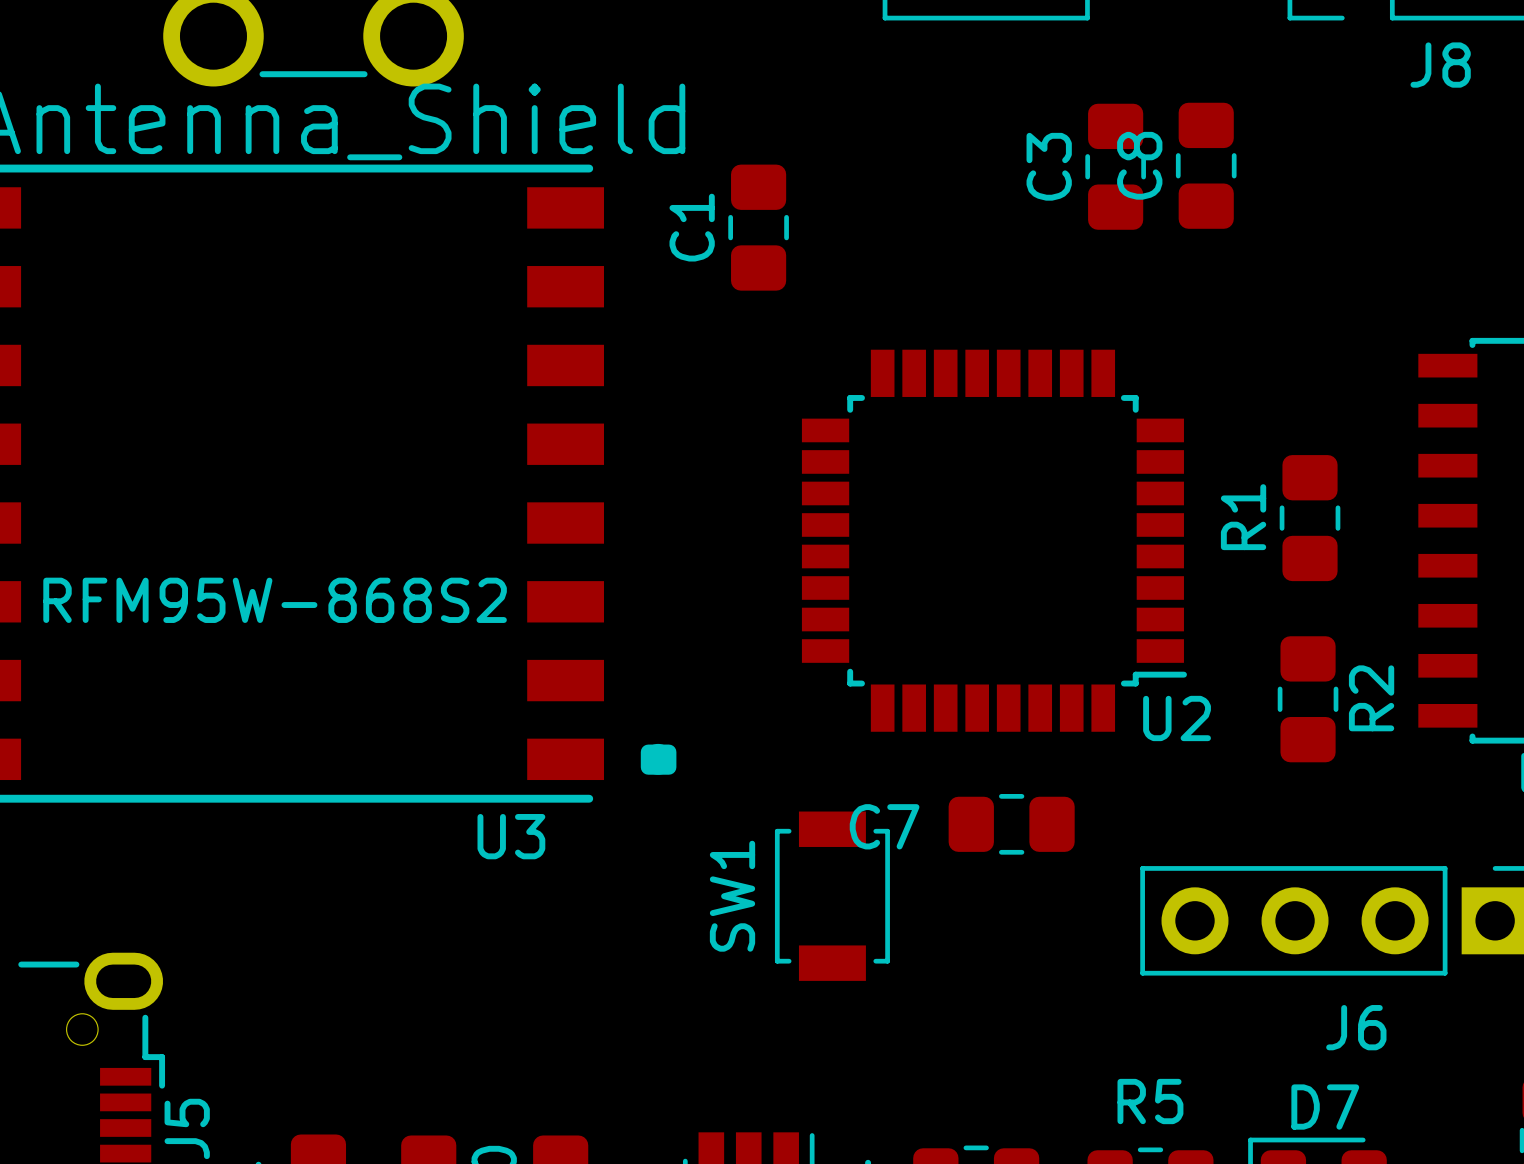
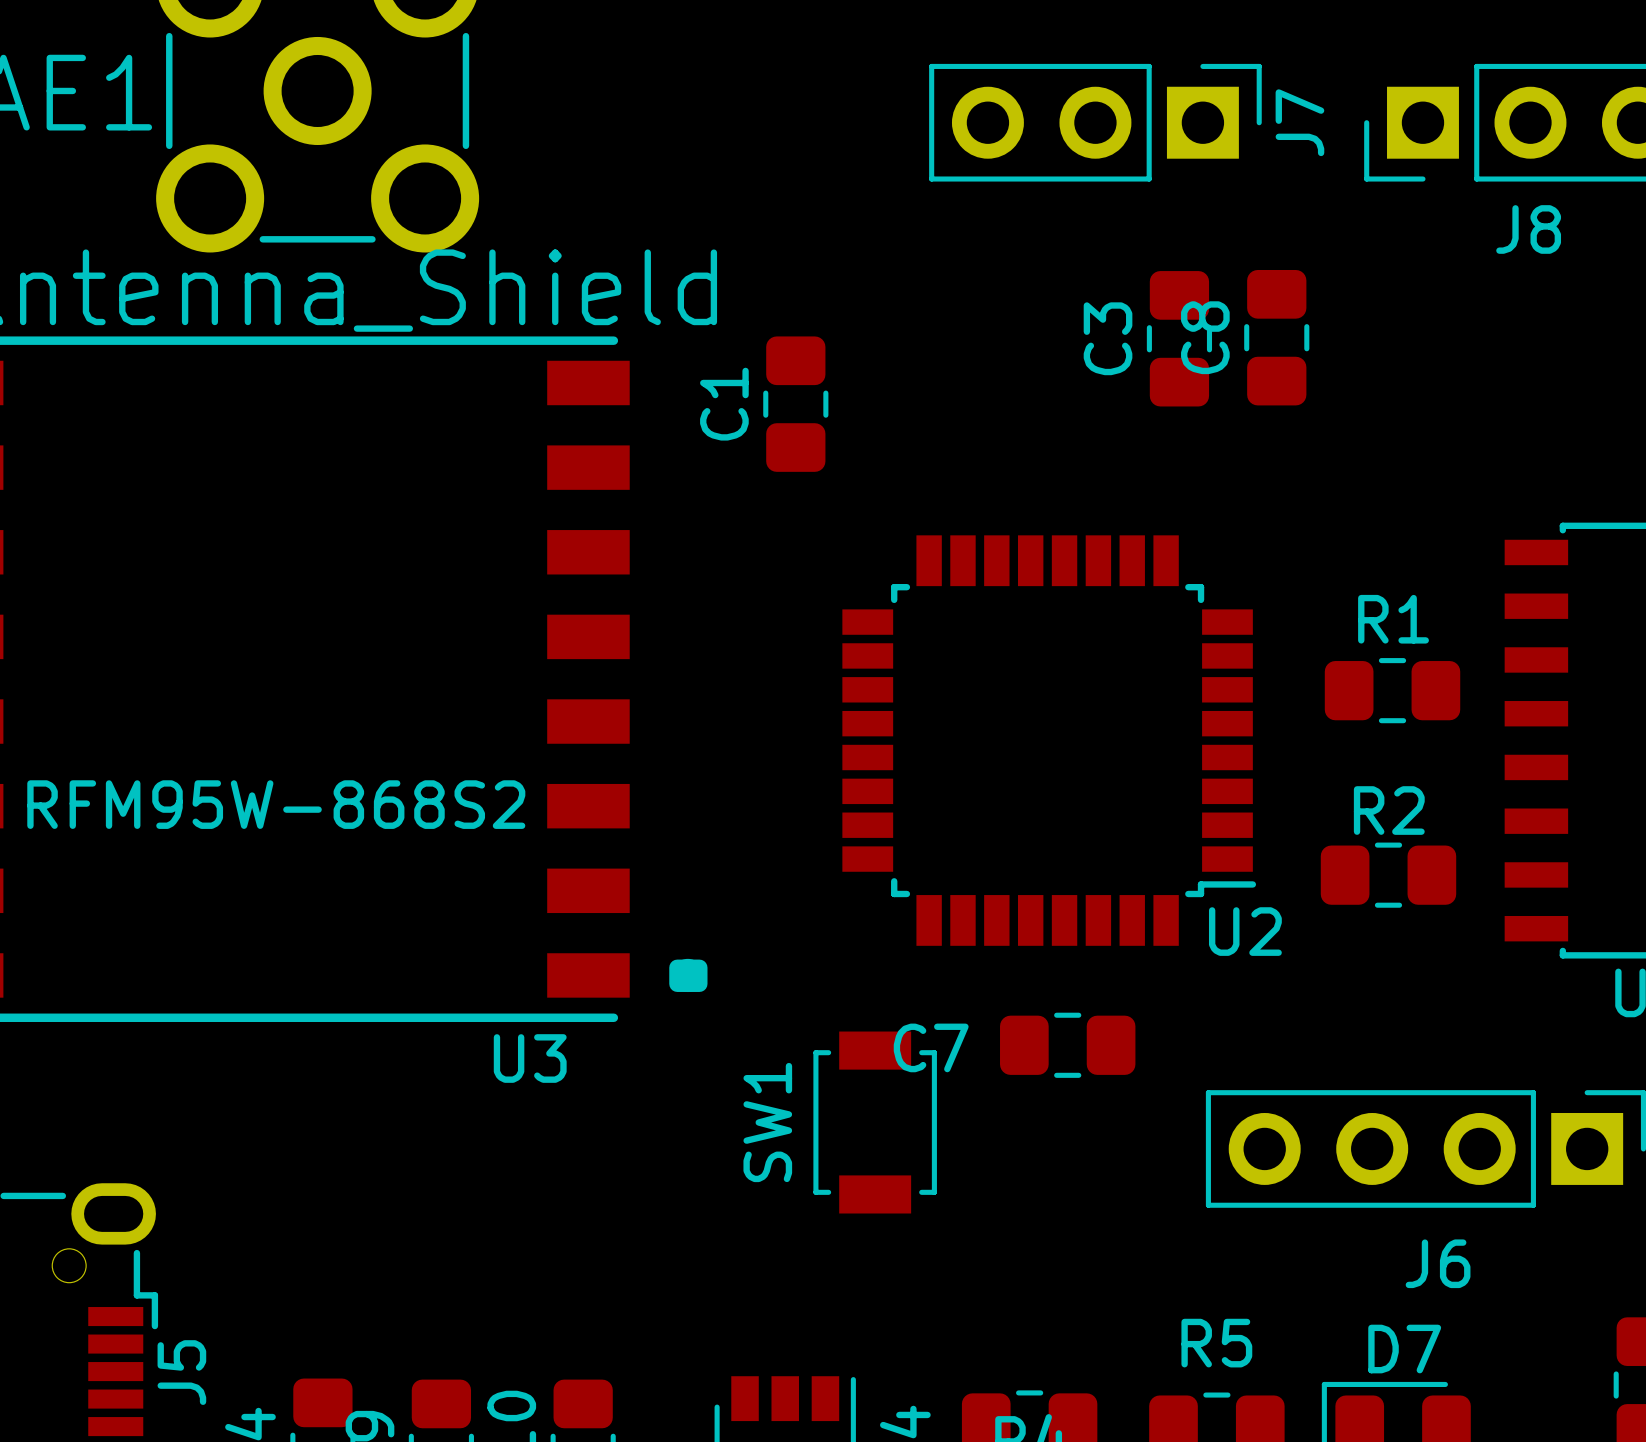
R1 rotation: 0° (1310, 518) -> 90° clockwise (1392, 690)
R2 name position: R2 (1371, 698) -> R2 (1389, 810)
R2 rotation: 0° (1308, 699) -> 90° clockwise (1388, 875)

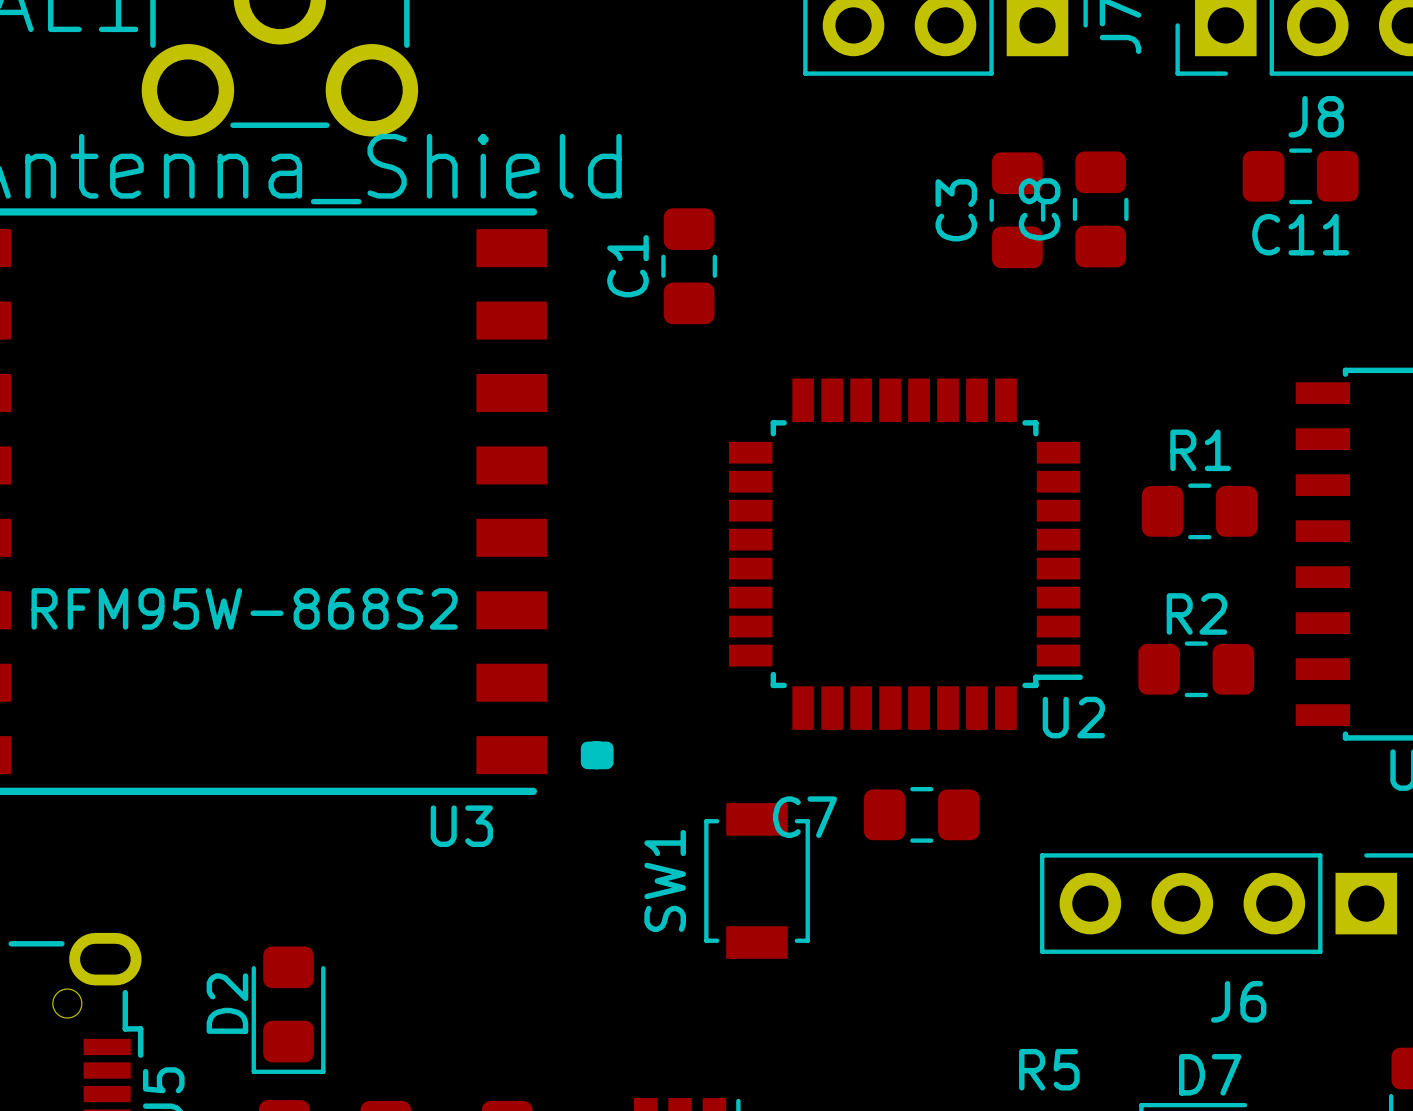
C11: none -> (1300, 176)
D2: none -> (288, 1010)

